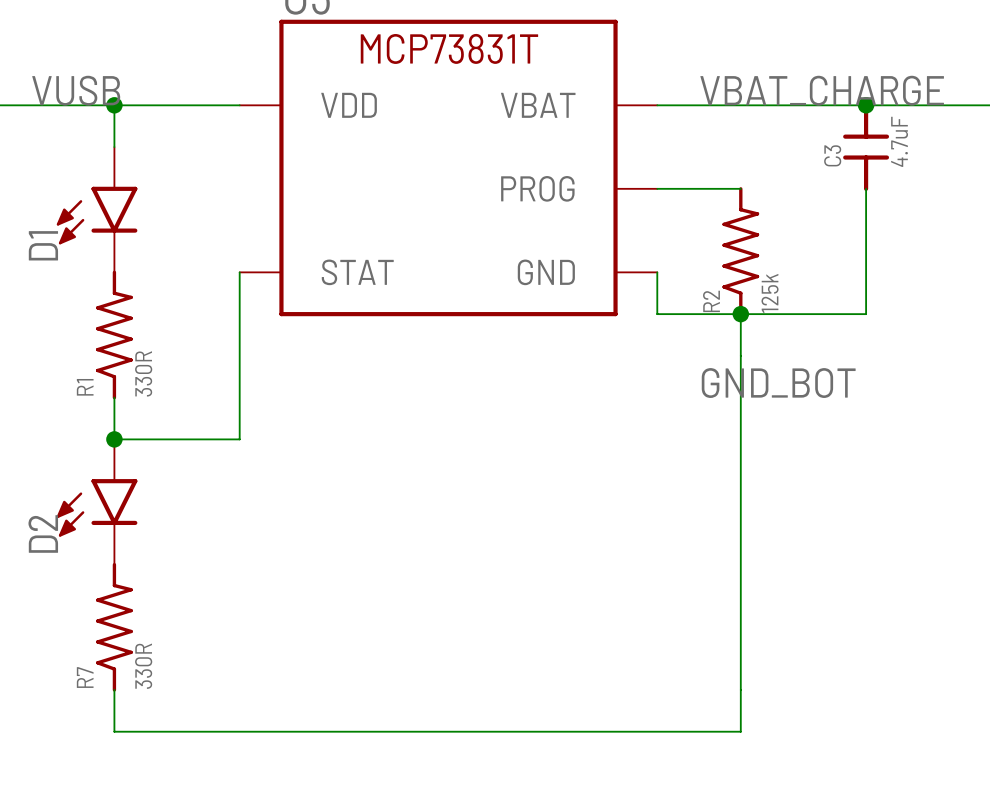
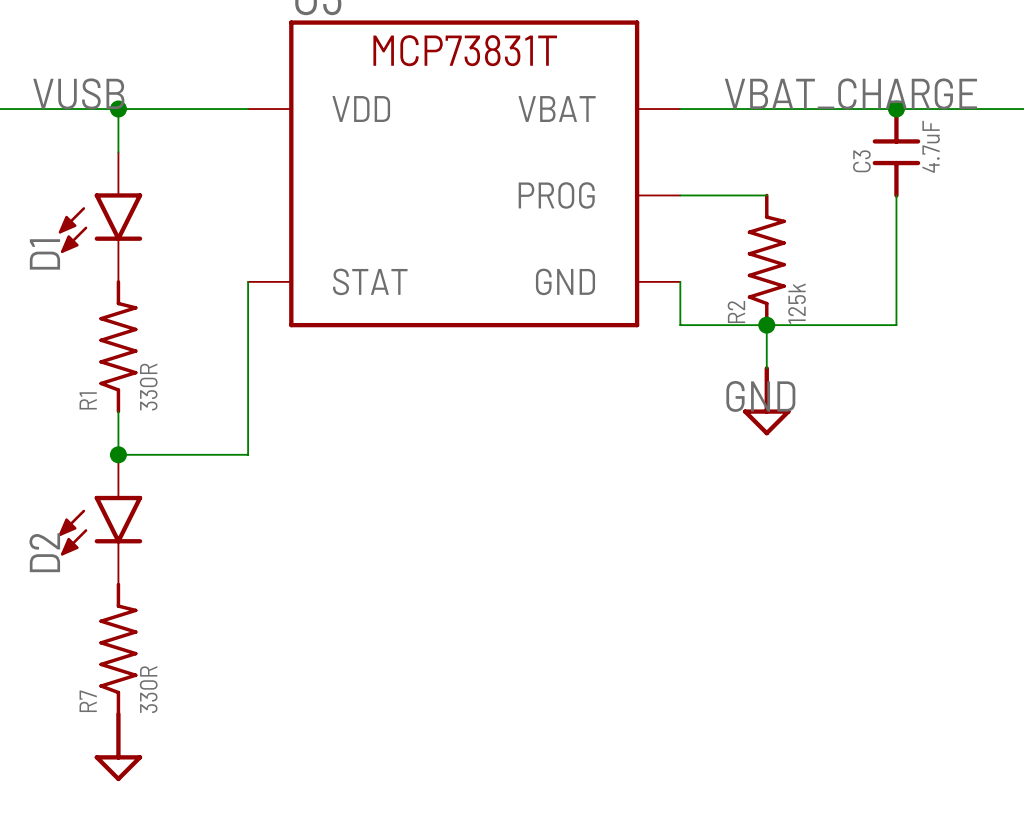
wire: (740, 355) (740, 731) (114, 731) (114, 689) -> none
label: GND_BOT (778, 383) -> GND (760, 396)
power symbol: none -> (766, 400)
power symbol: none -> (118, 746)

